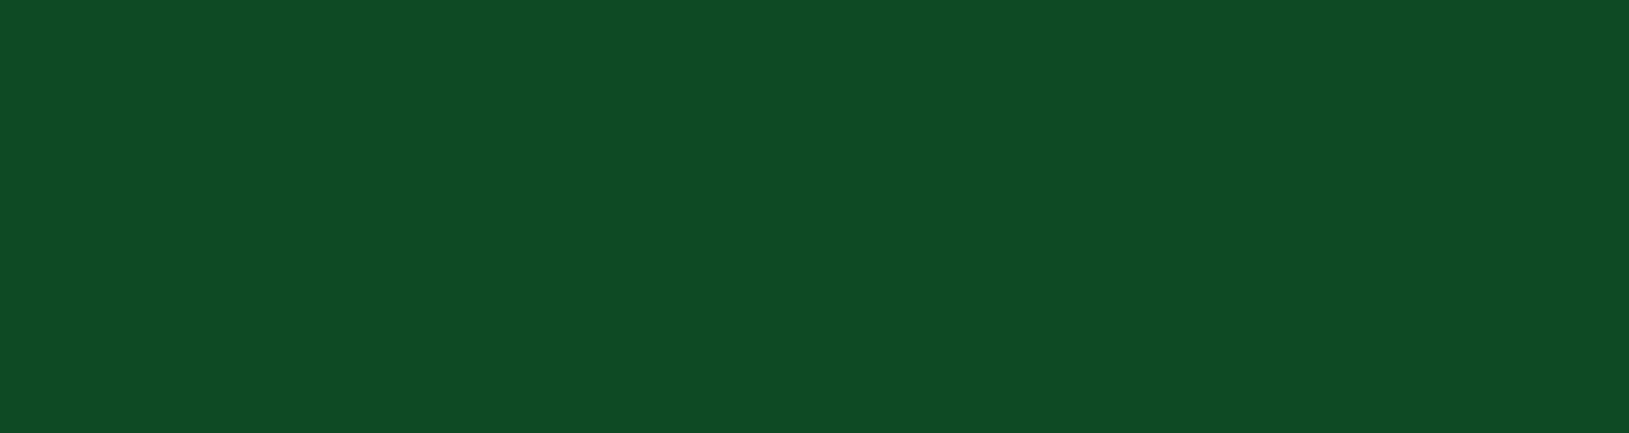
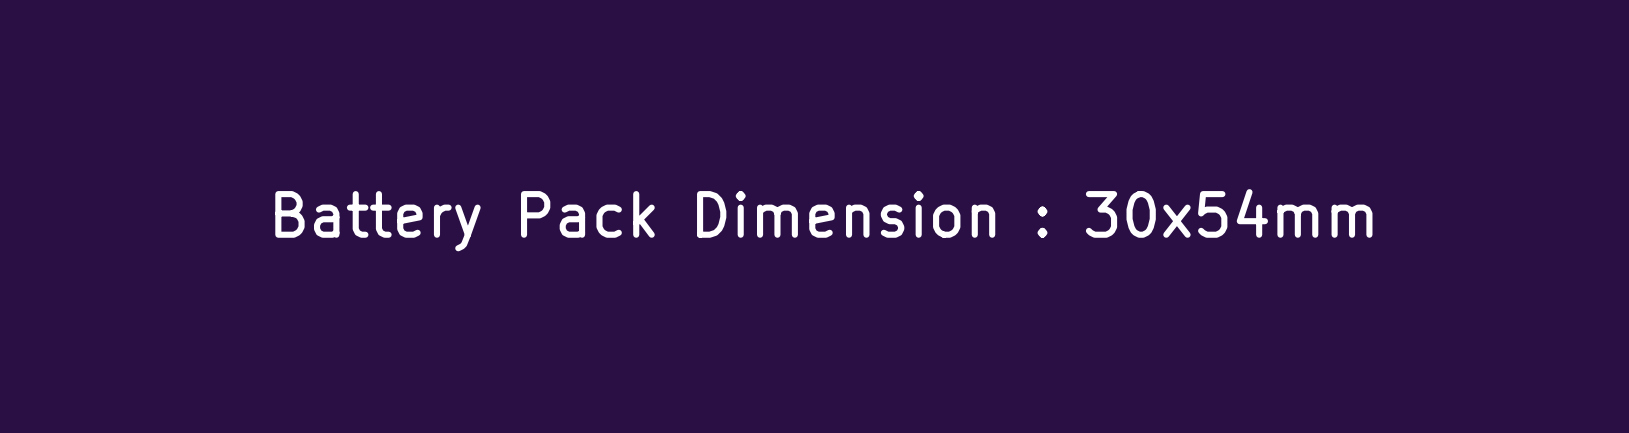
text: none -> Battery Pack Dimension : 30x54mm (823, 220)

